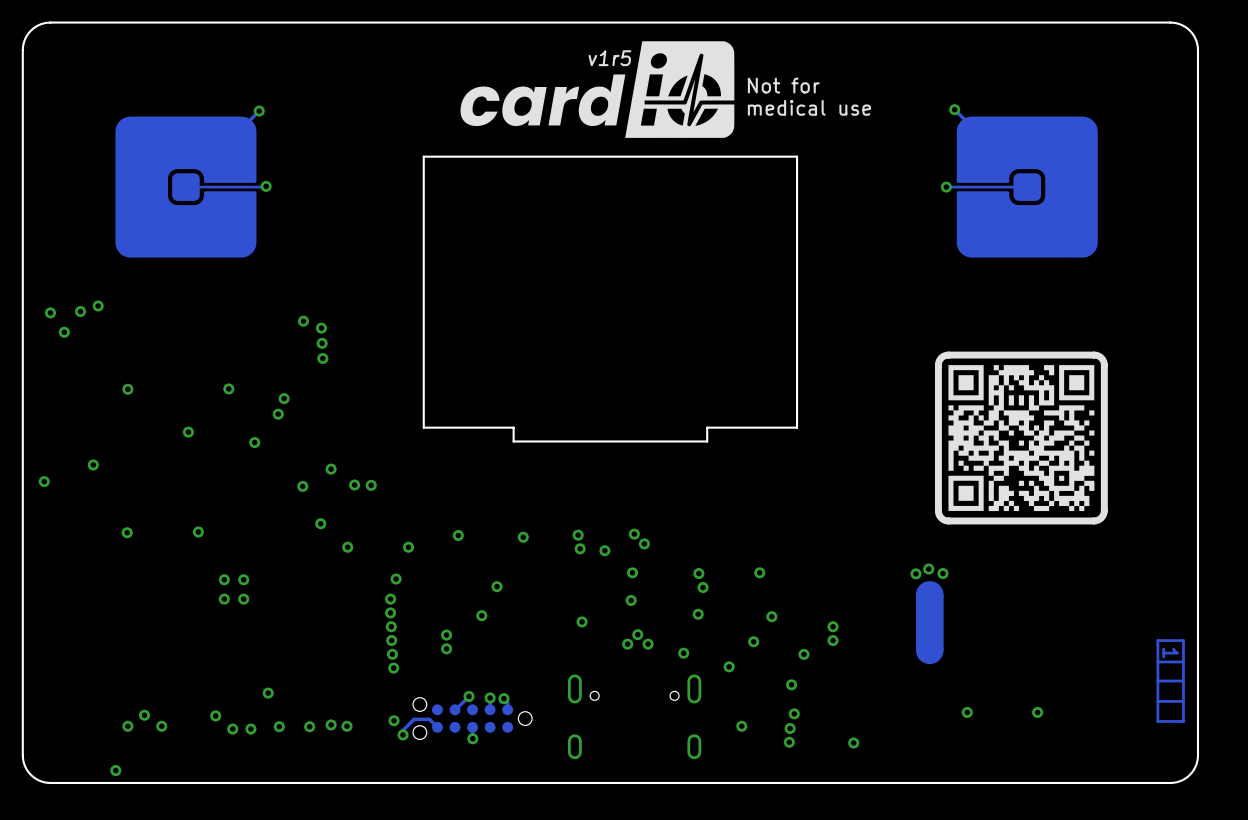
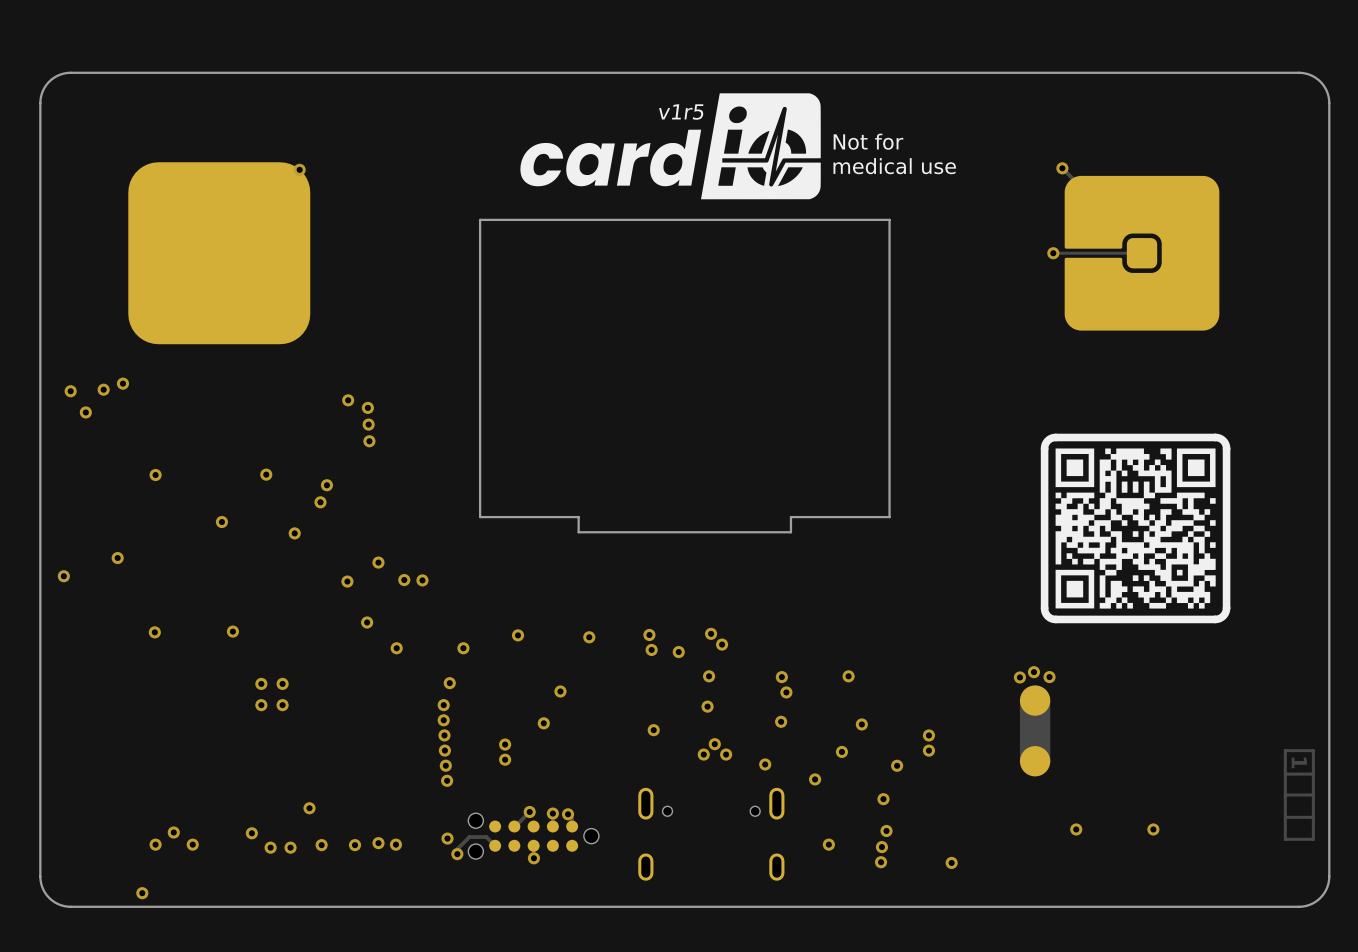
part footprint: [115, 116, 257, 258] -> [128, 162, 311, 345]
via: (266, 186) -> none

